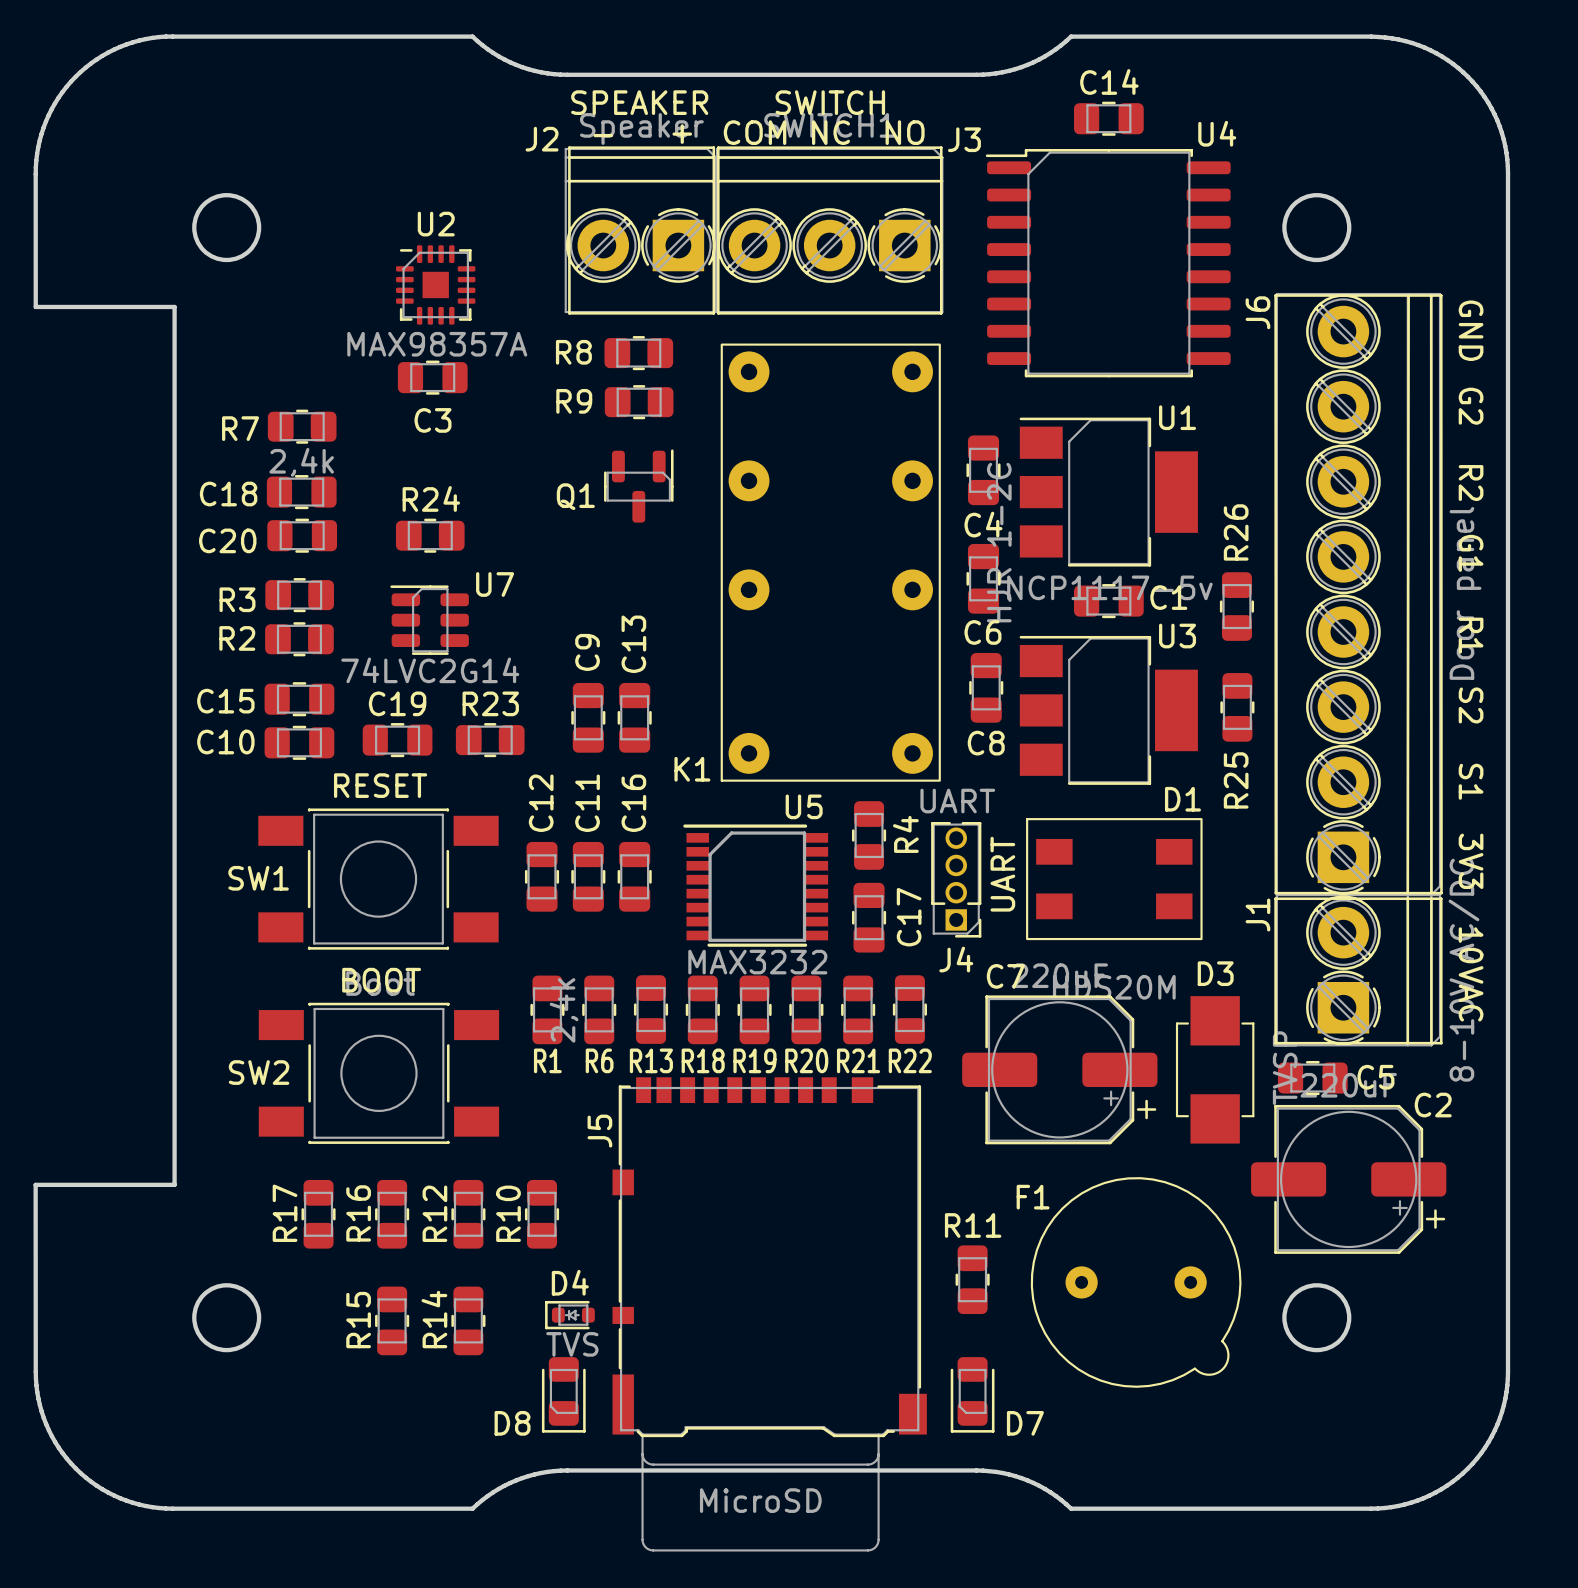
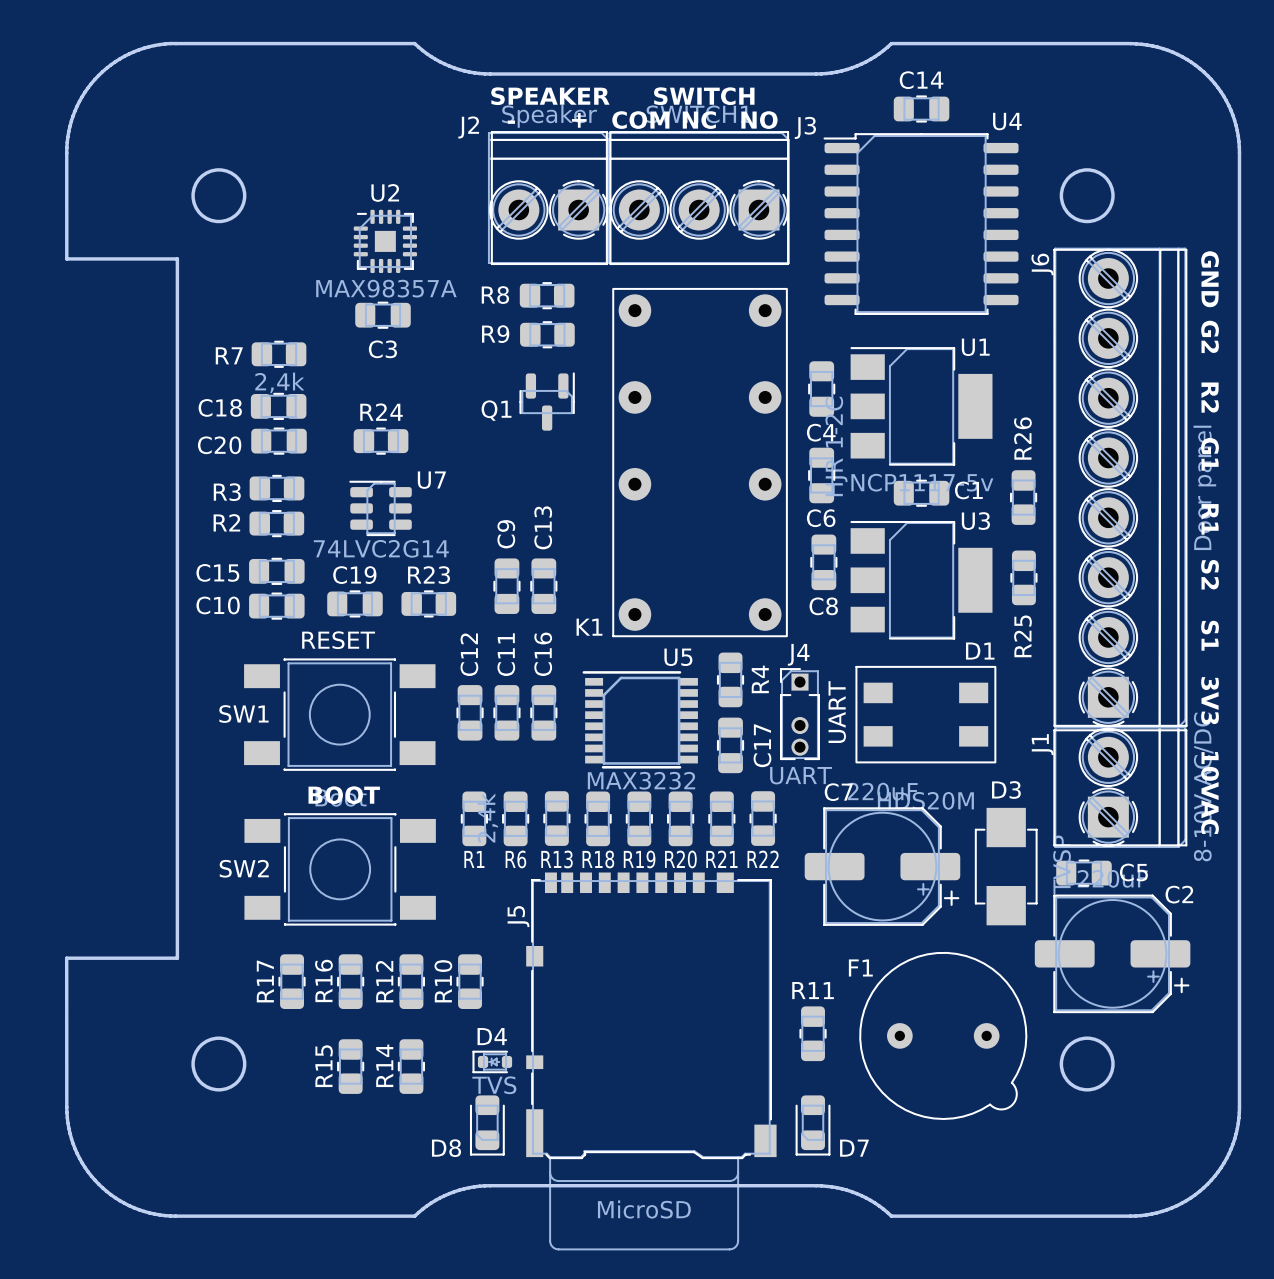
J4 value position: UART (957, 801) -> UART (801, 775)
J4 footprint: [931, 822, 982, 938] -> [779, 668, 820, 761]
J4 name position: J4 (956, 959) -> J4 (798, 654)

